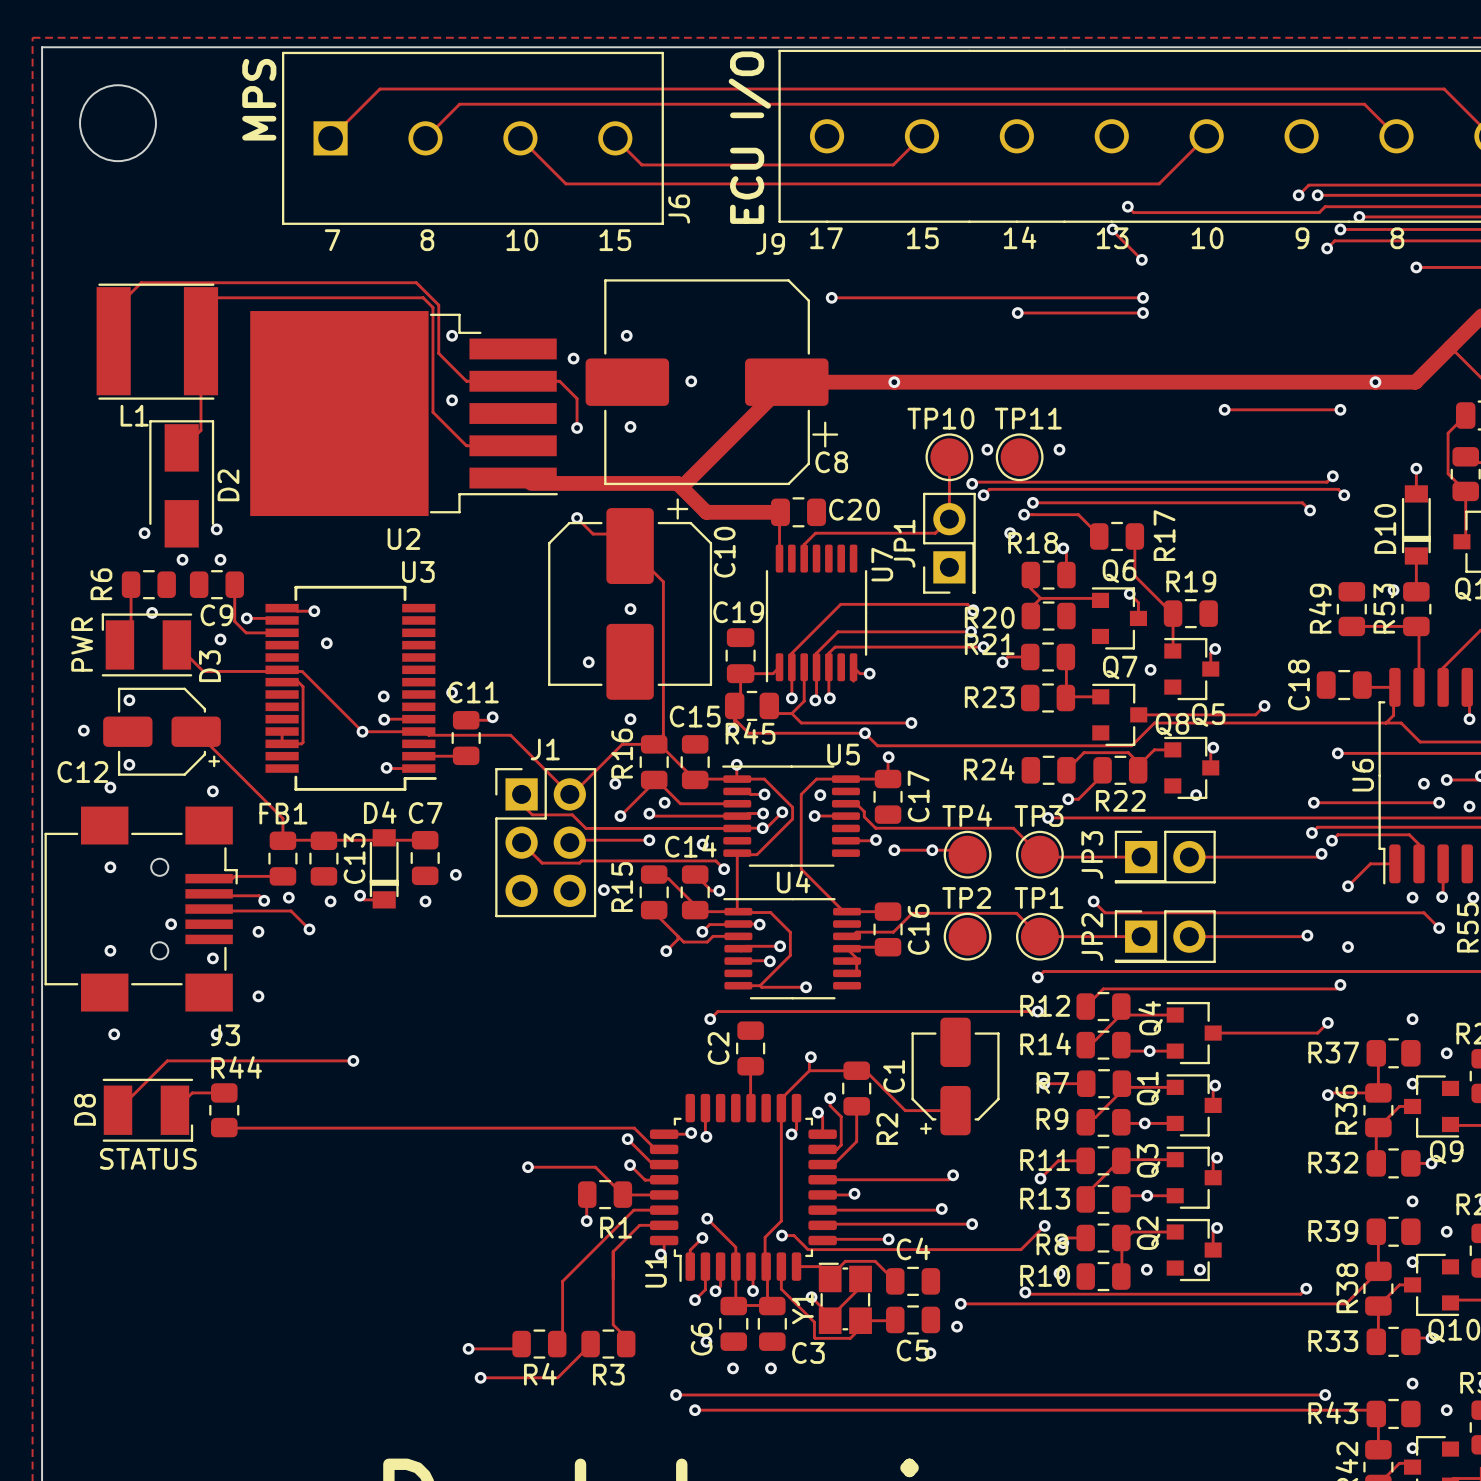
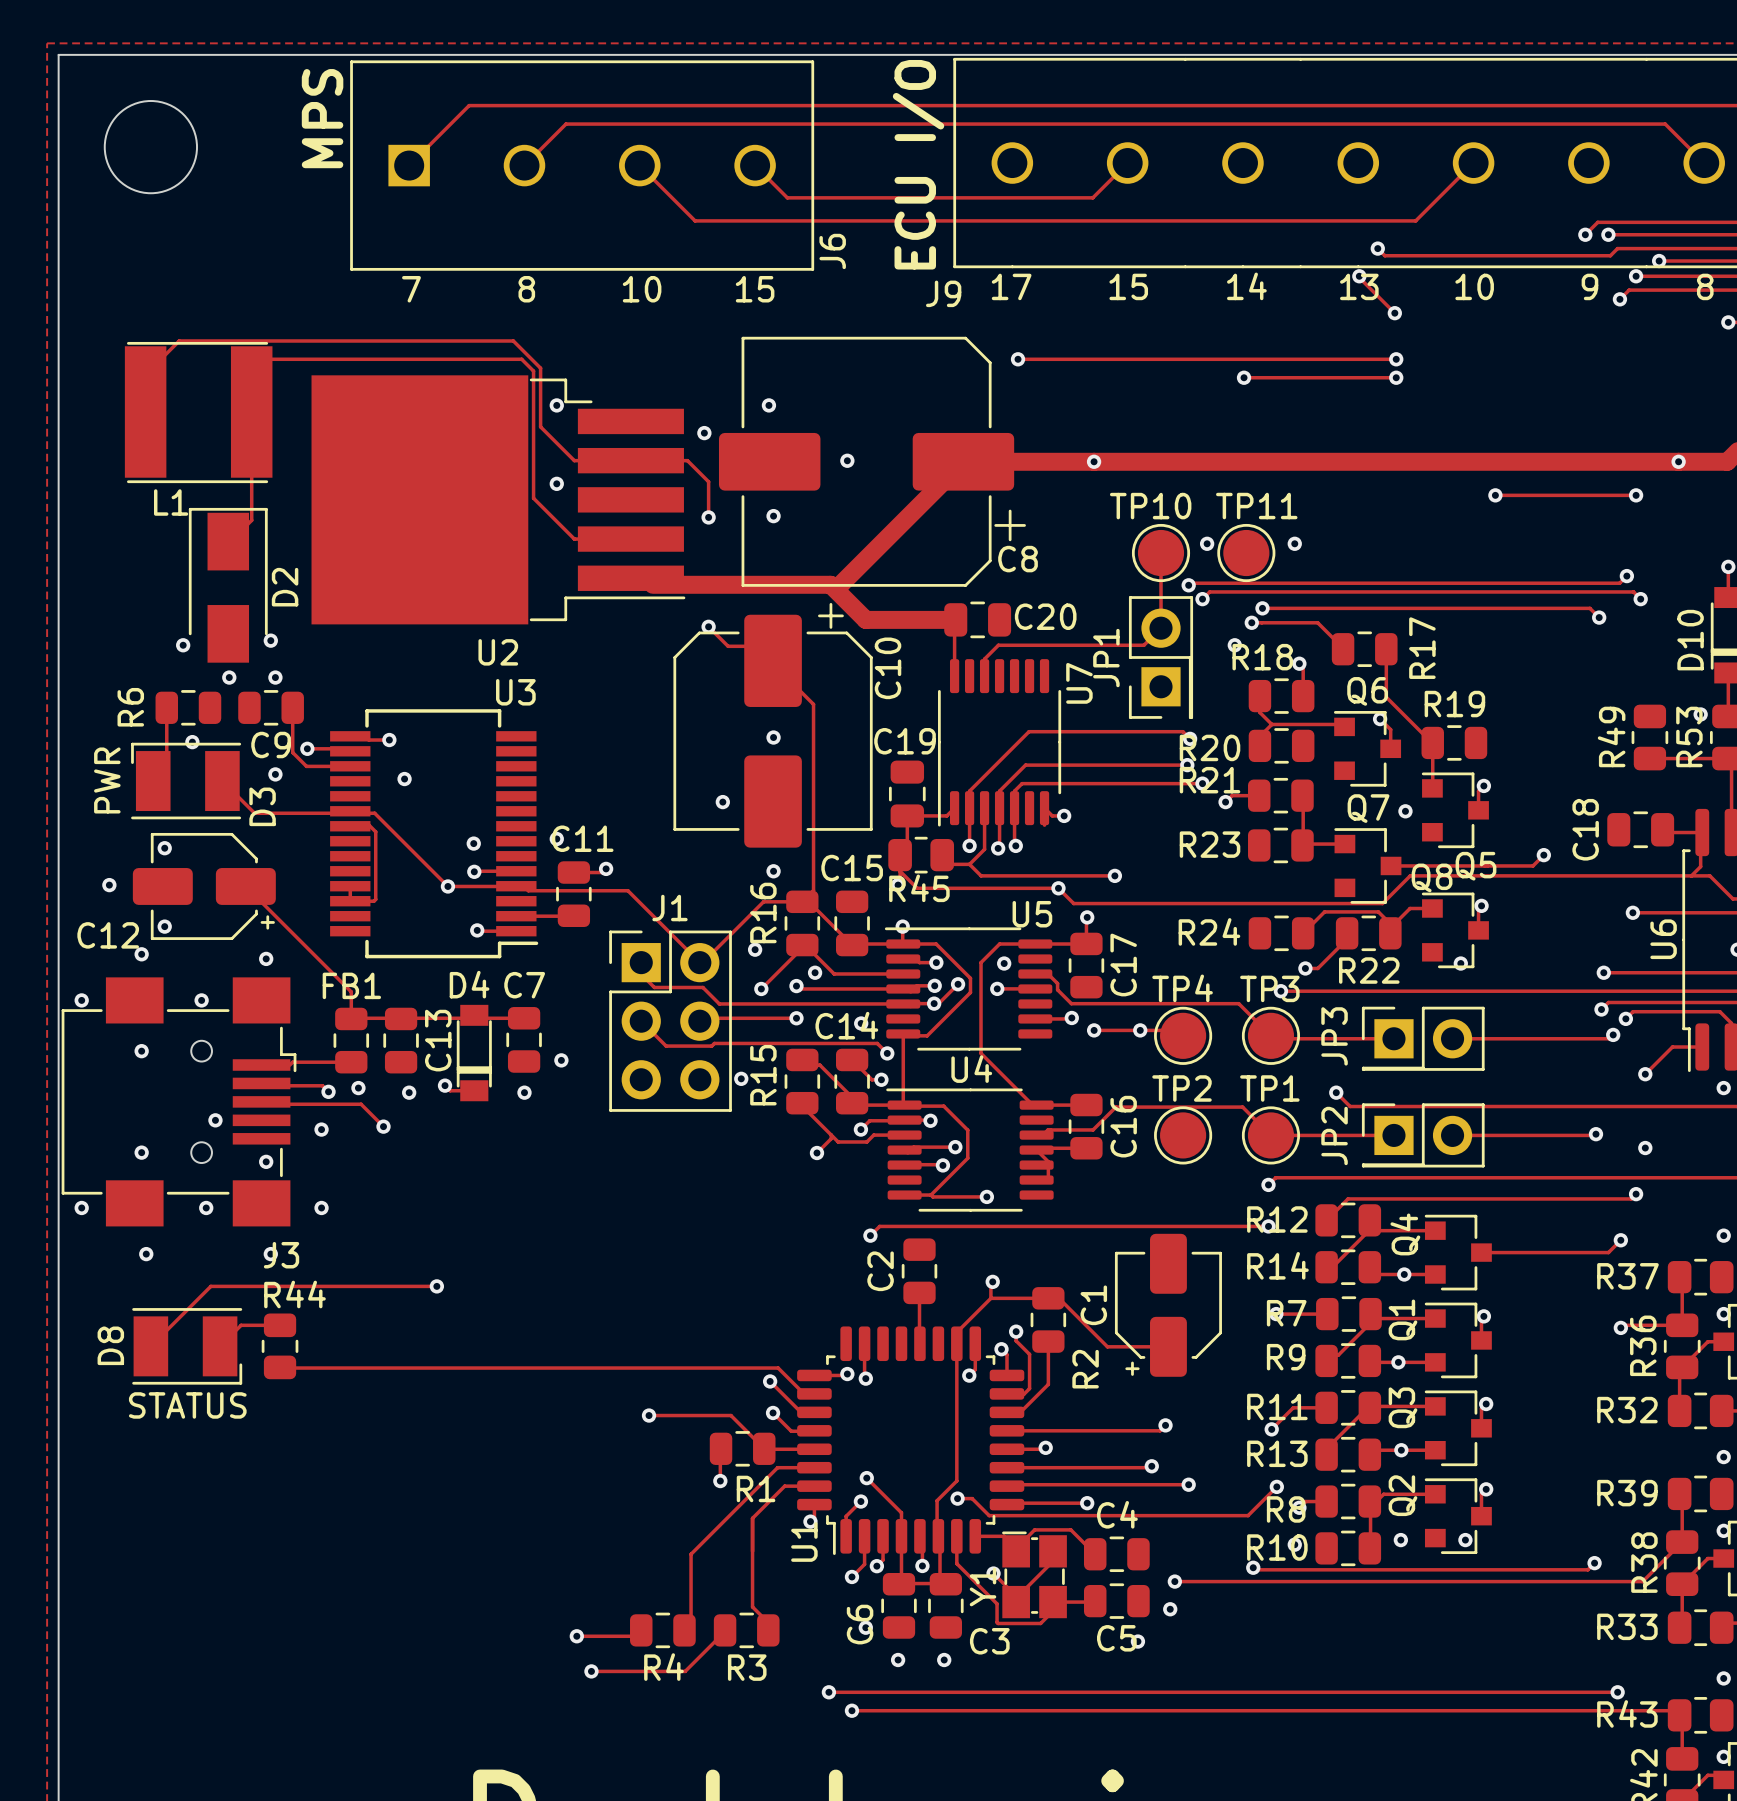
via: none -> (81, 1000)
via: none -> (201, 1000)
via: none -> (81, 1207)
via: none -> (206, 1207)

